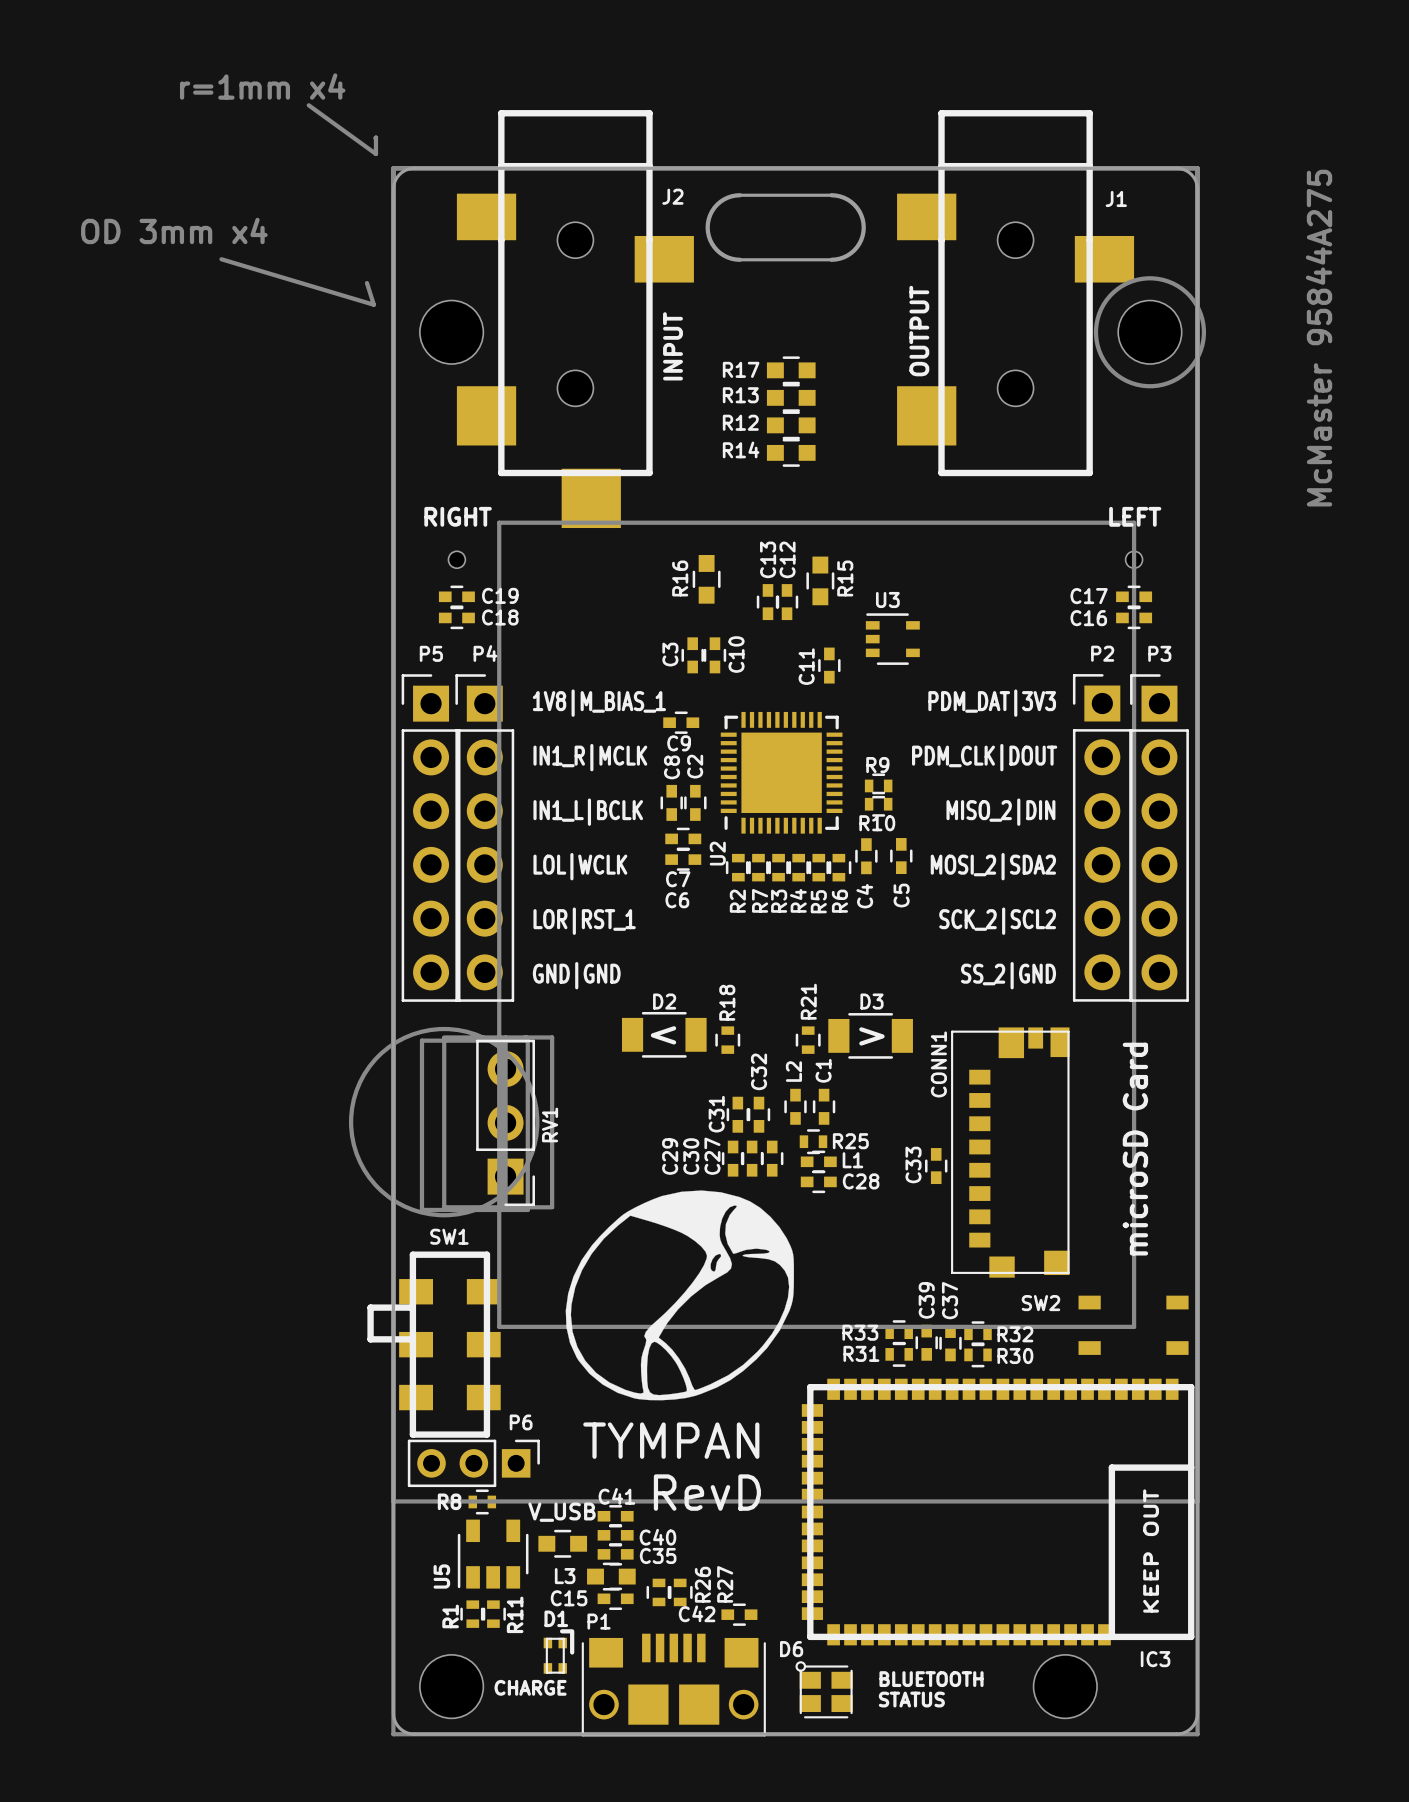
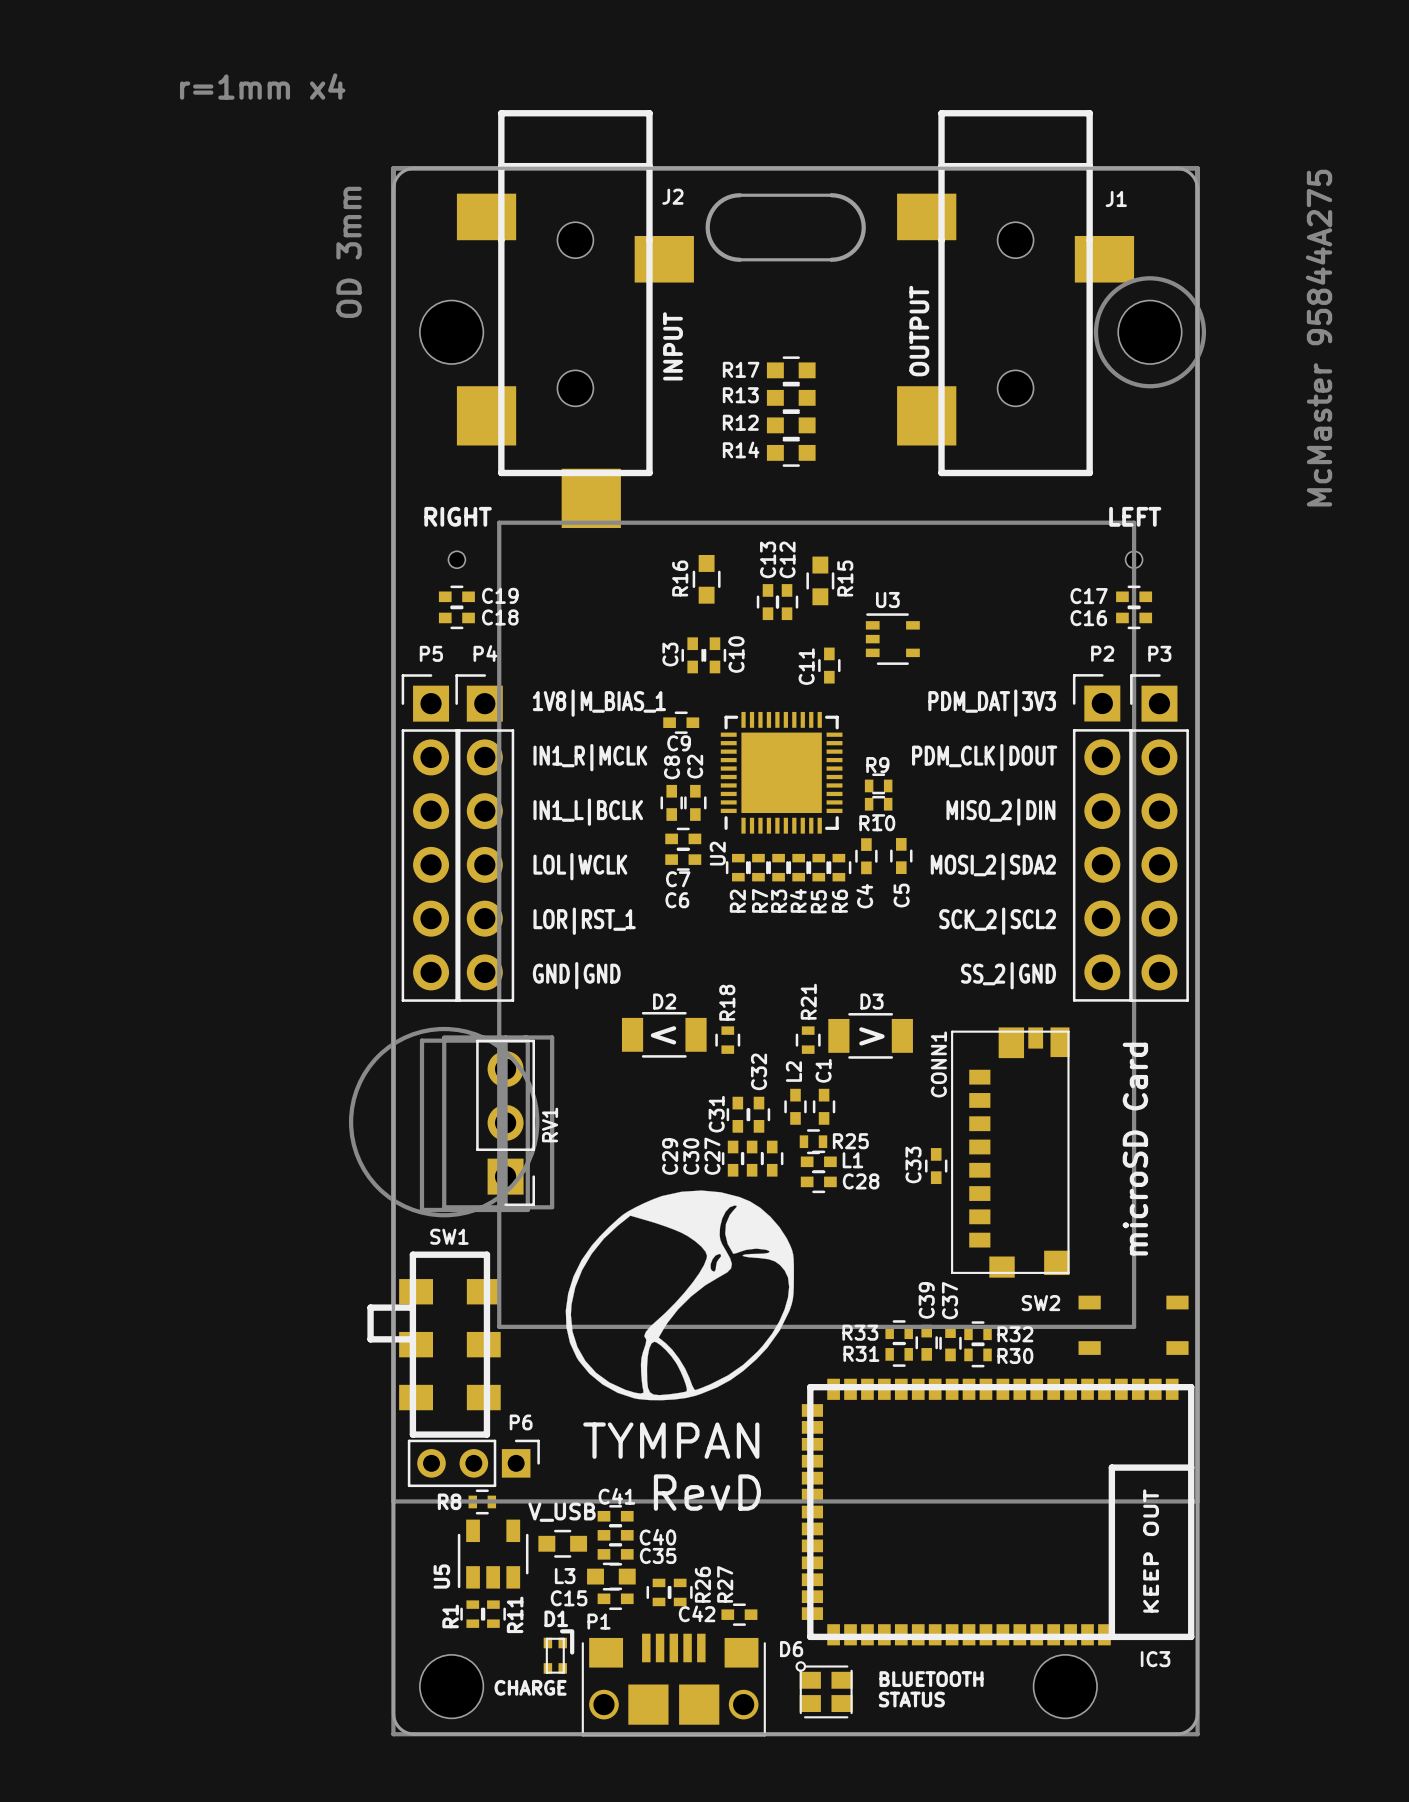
line: (308, 105) (375, 153) (375, 138) -> none
text: OD 3mm x4 (174, 230) -> none
text: none -> OD 3mm (349, 252)
line: (221, 259) (373, 304) (366, 283) -> none

